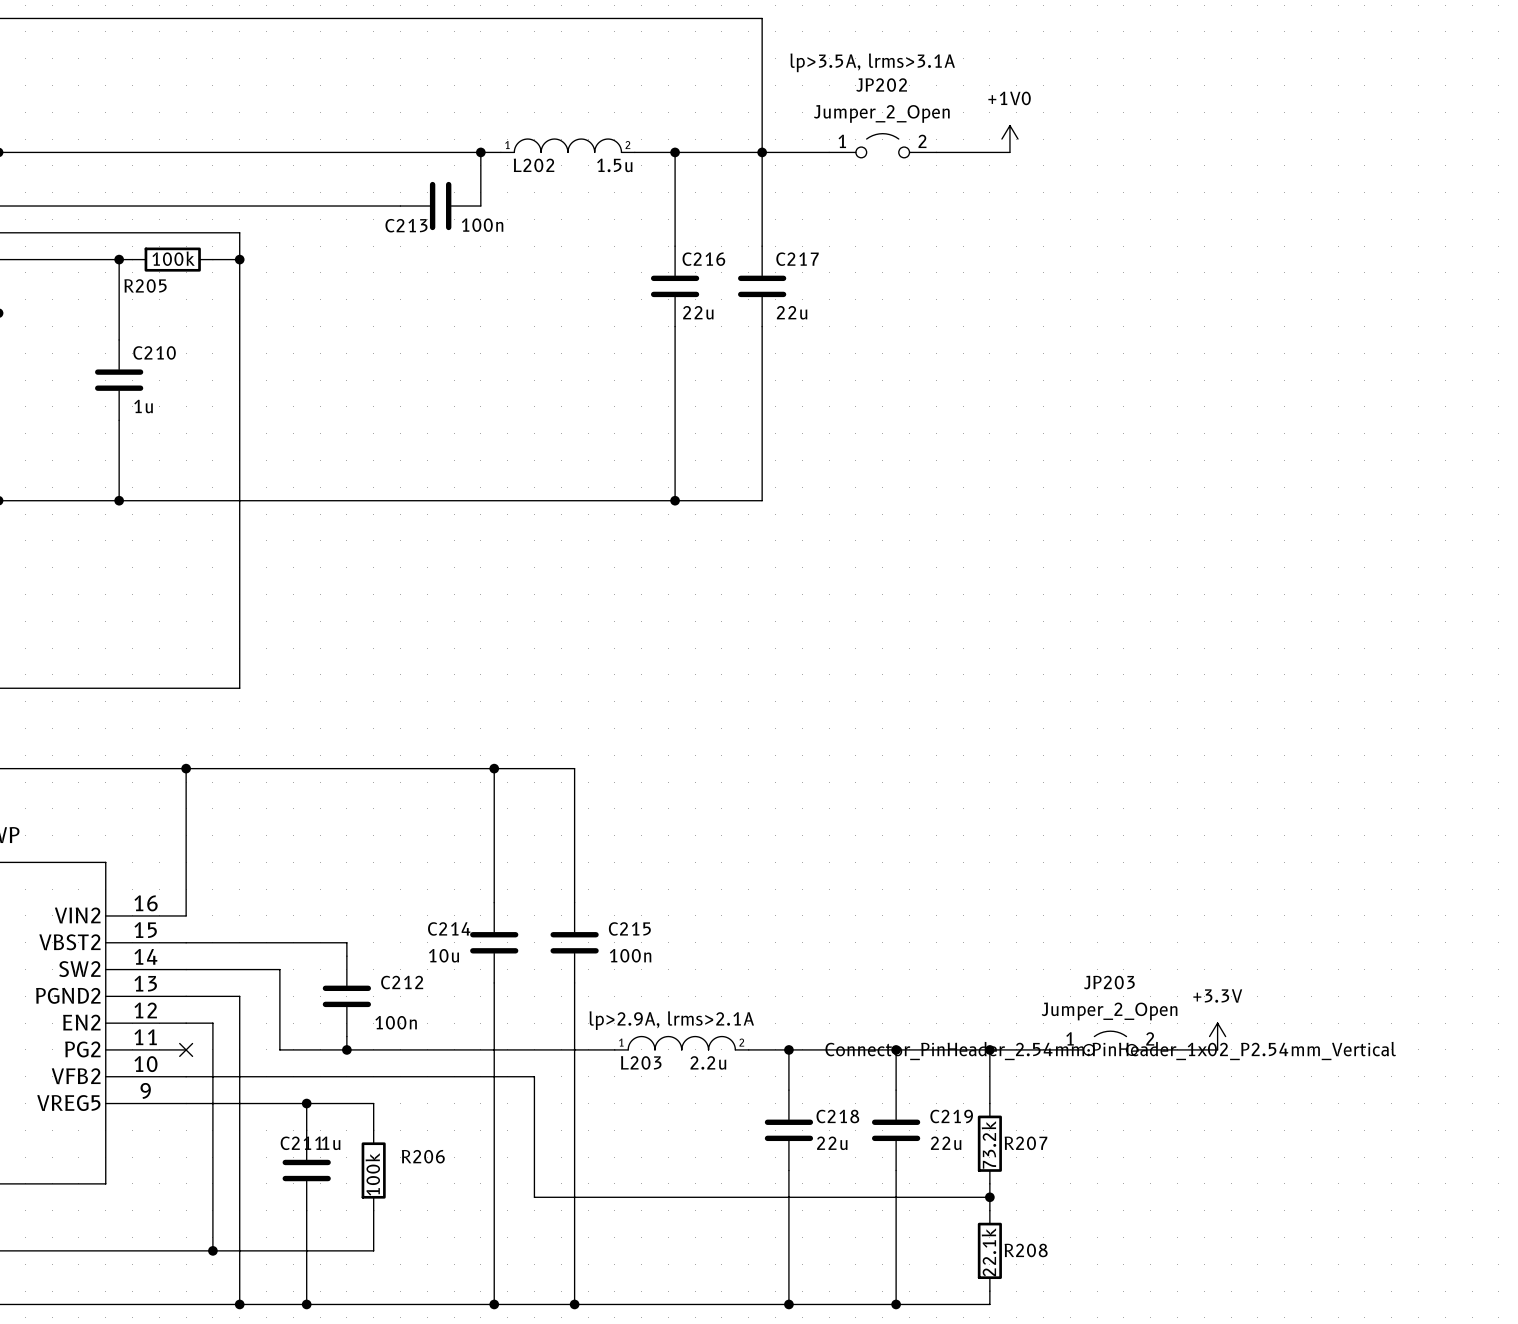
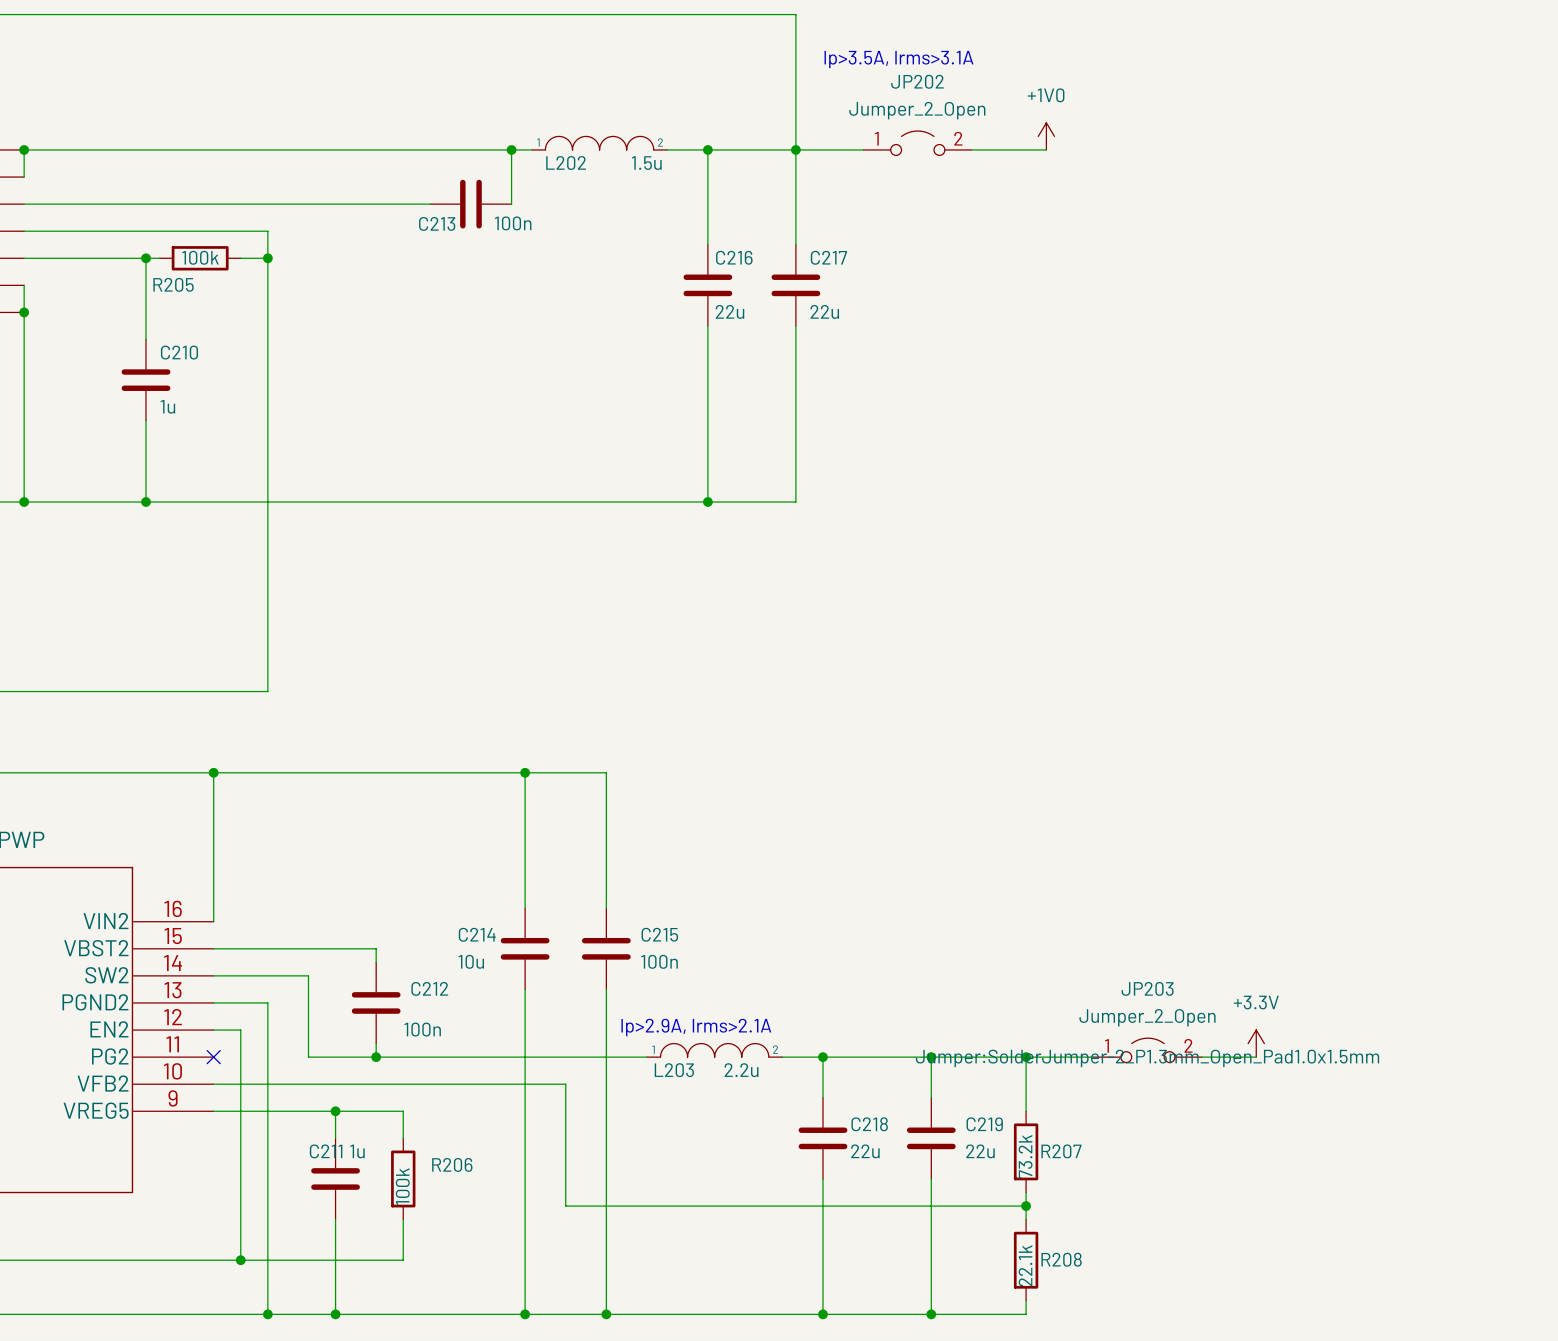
JP203 text: Connector_PinHeader_2.54mm:PinHeader_1x02_P2.54mm_Vertical (1110, 1051) -> Jumper:SolderJumper-2_P1.3mm_Open_Pad1.0x1.5mm (1147, 1058)

